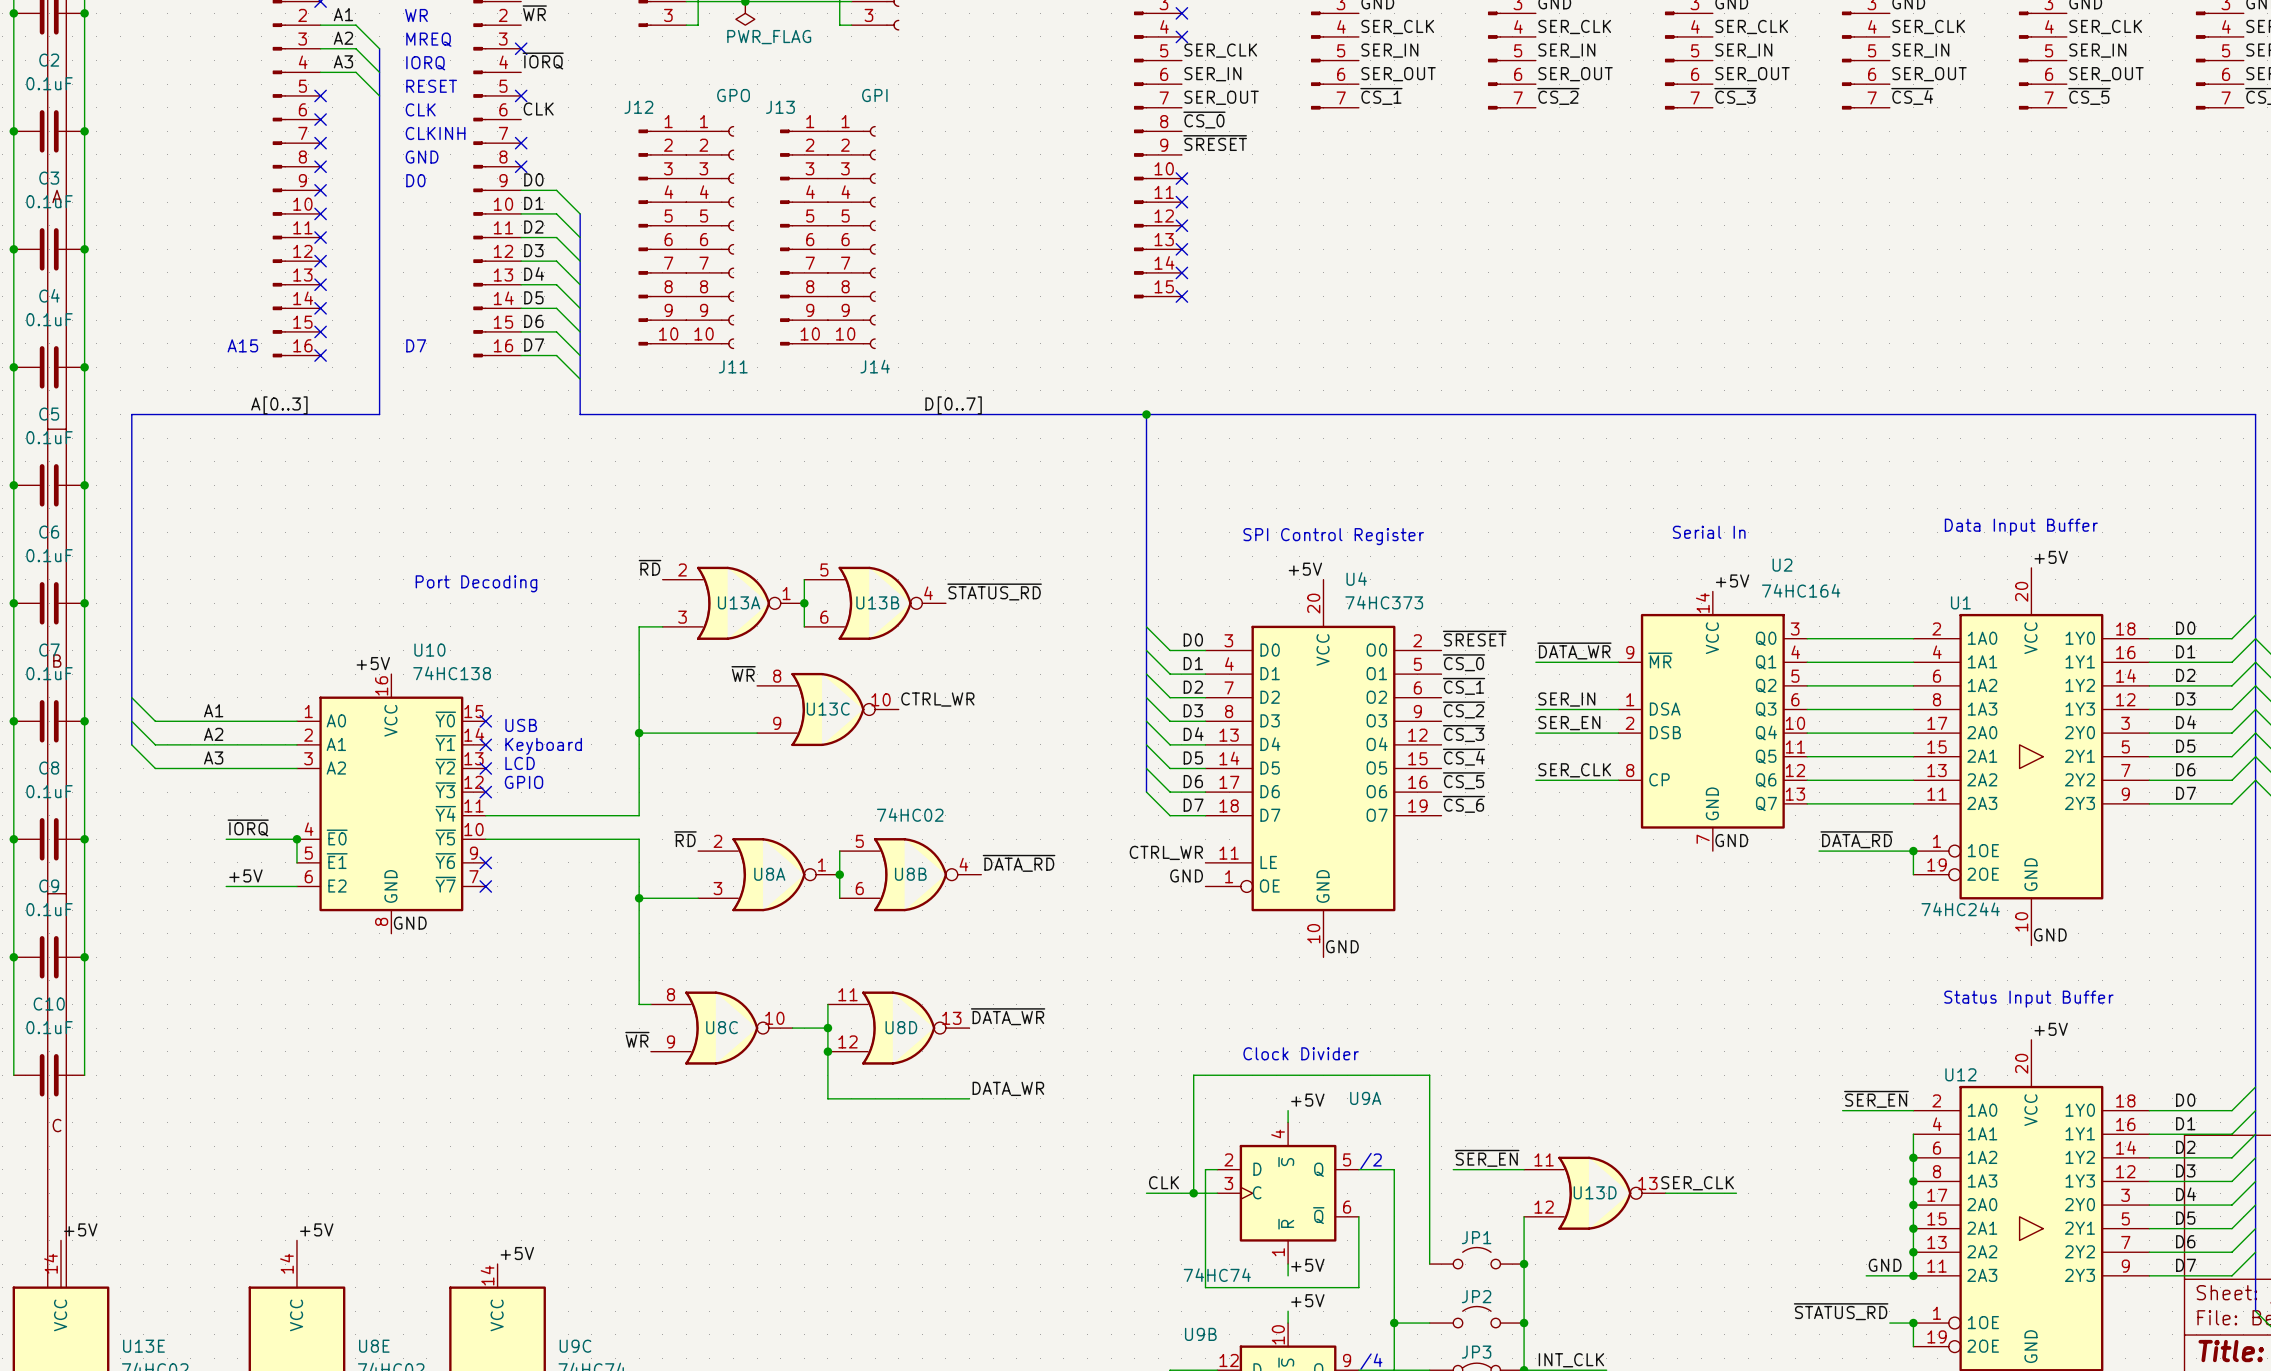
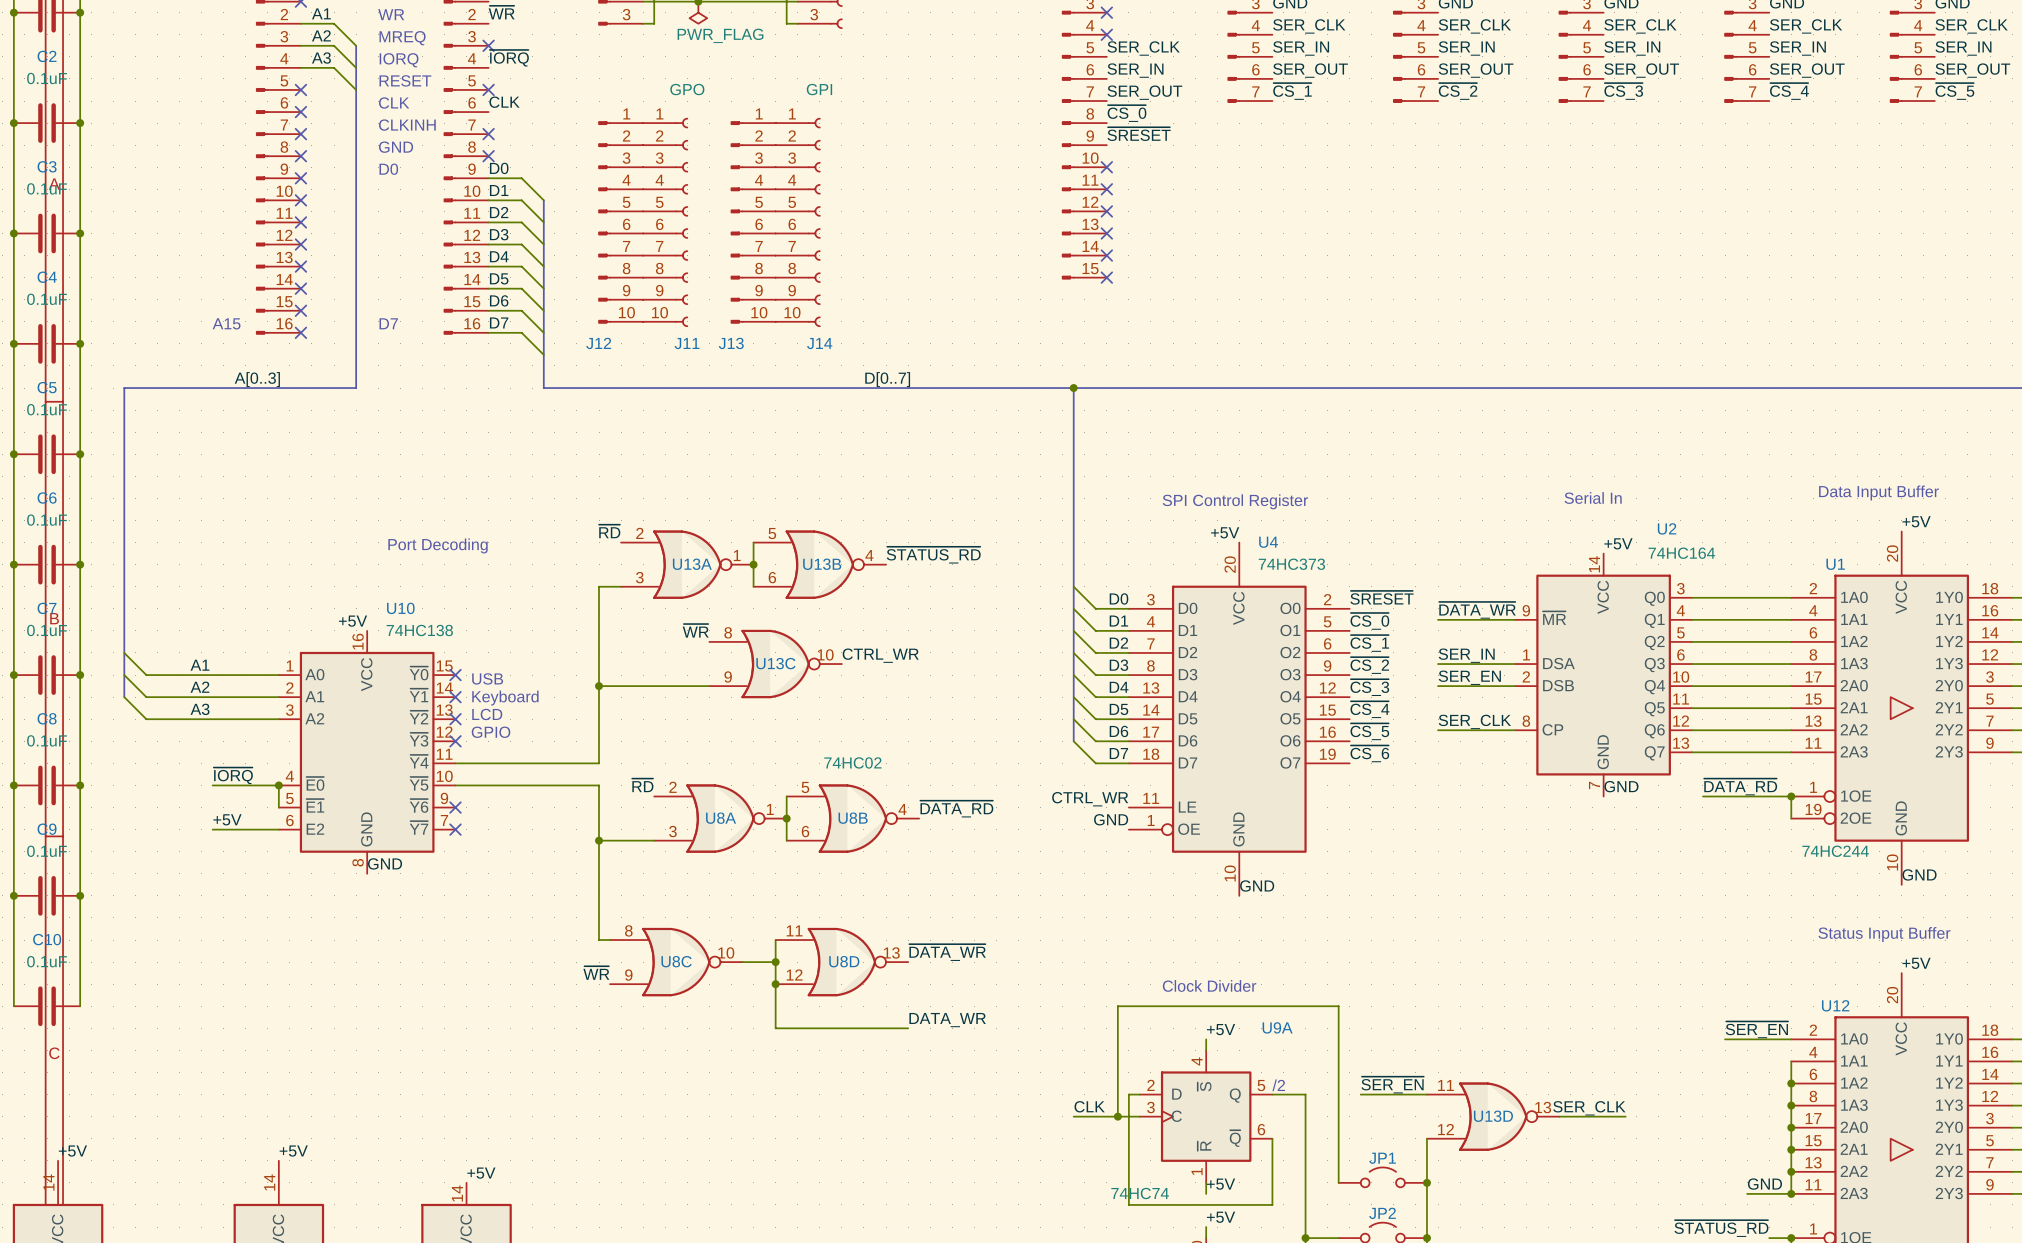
J12 name position: J12 (638, 107) -> J12 (598, 343)
J13 name position: J13 (780, 107) -> J13 (731, 343)

